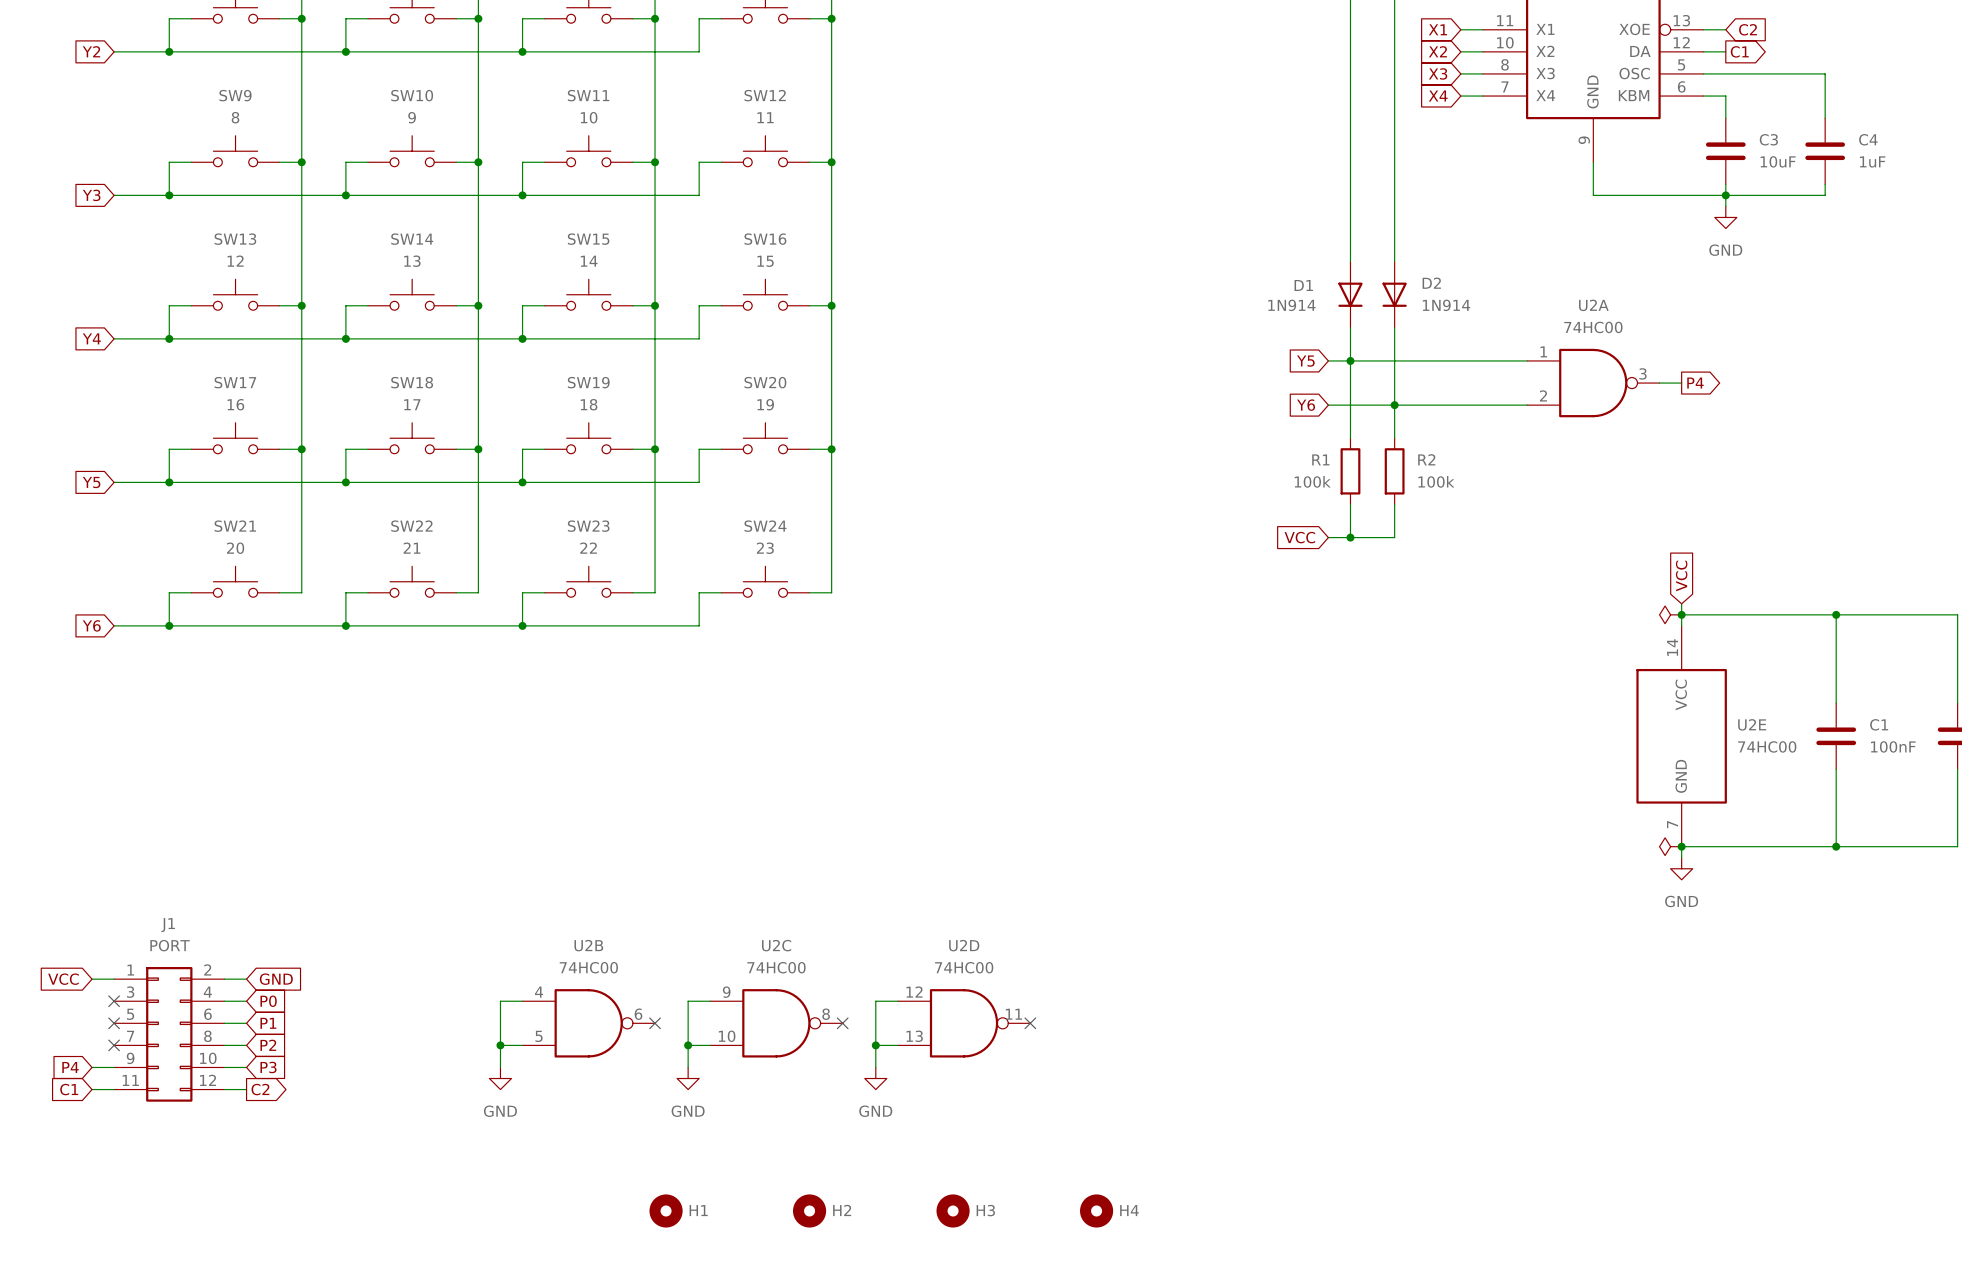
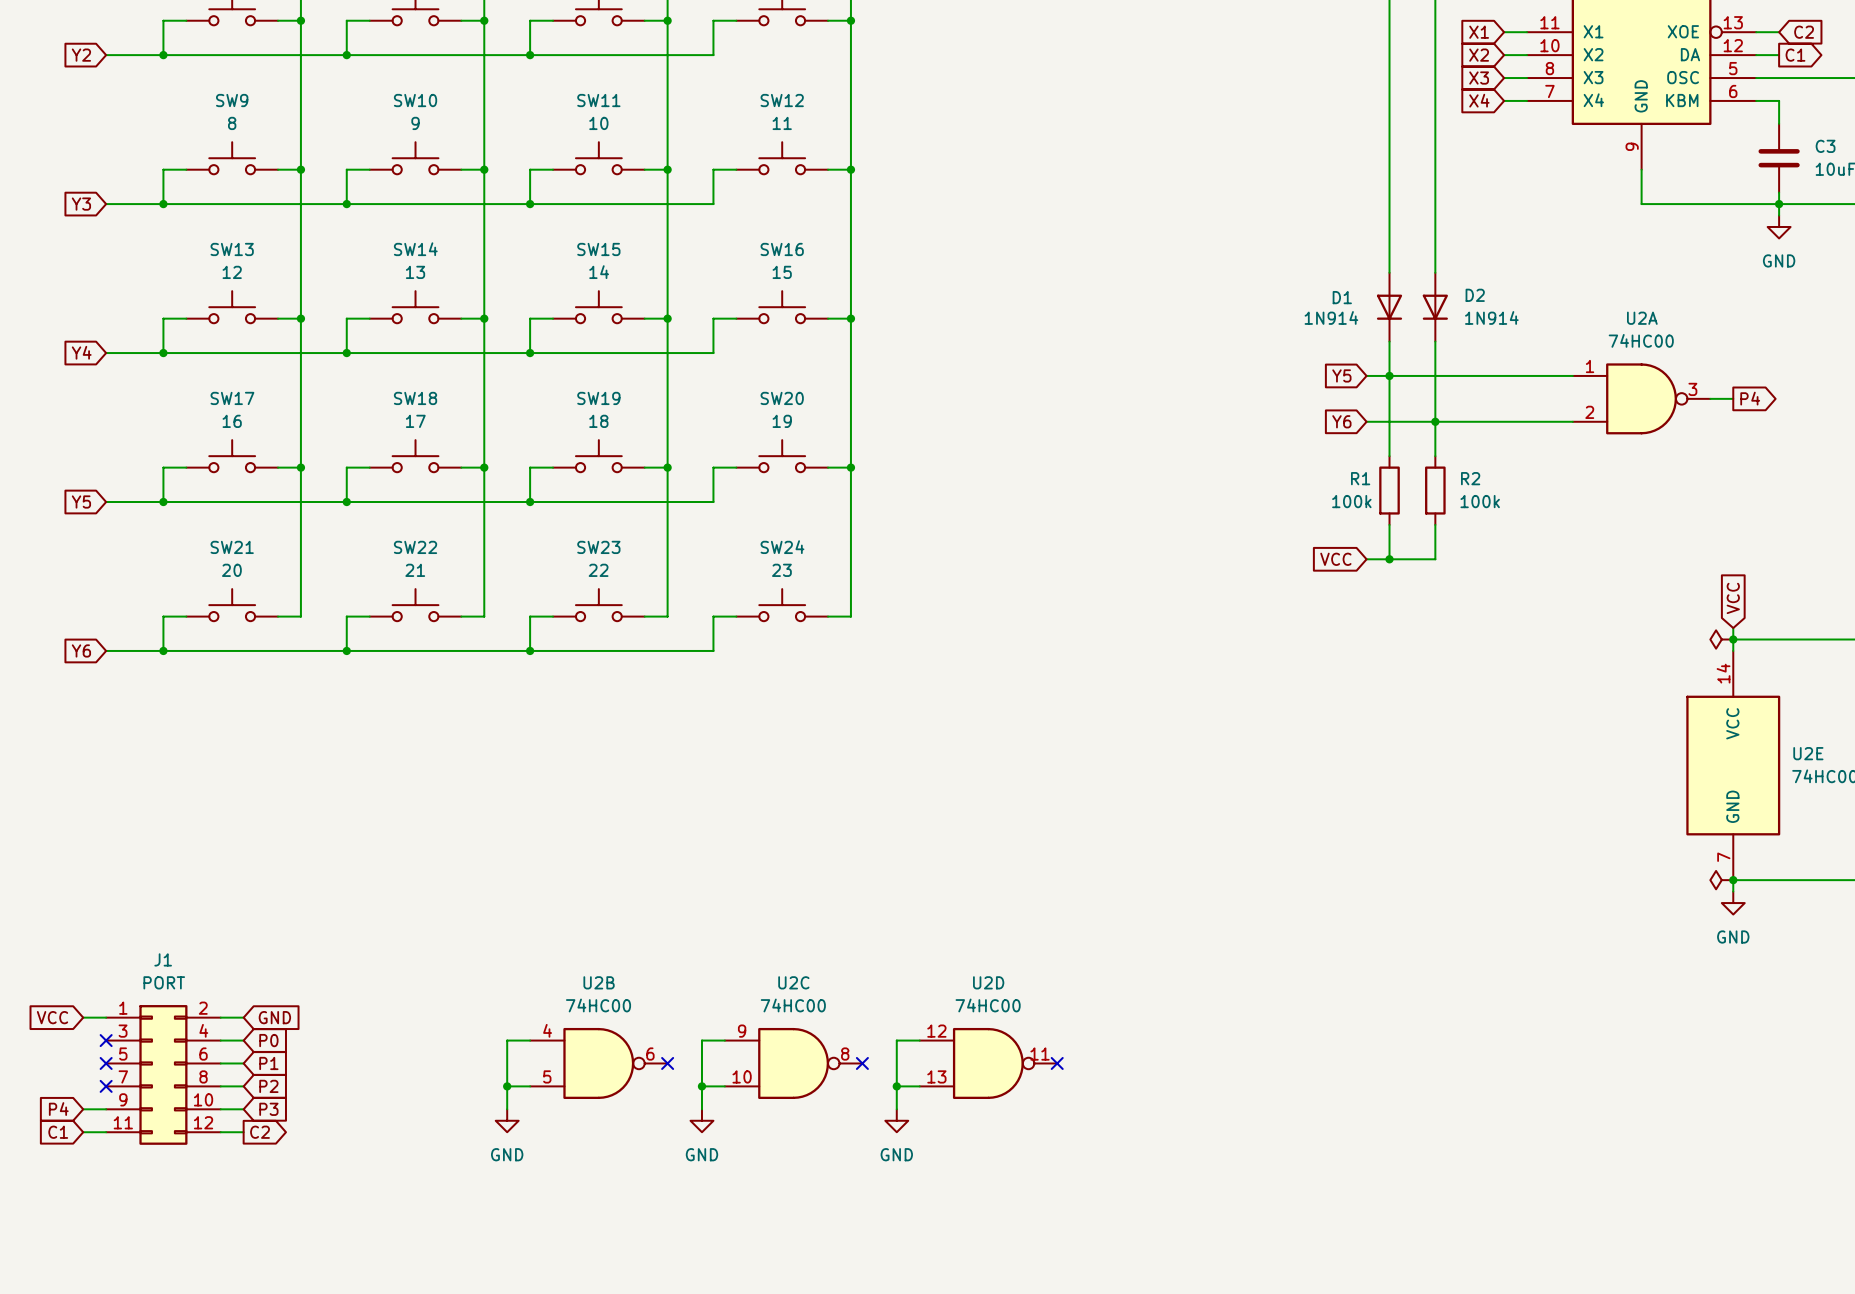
H1: (666, 1210) -> none
H2: (809, 1210) -> none
H3: (953, 1210) -> none
H4: (1096, 1210) -> none

